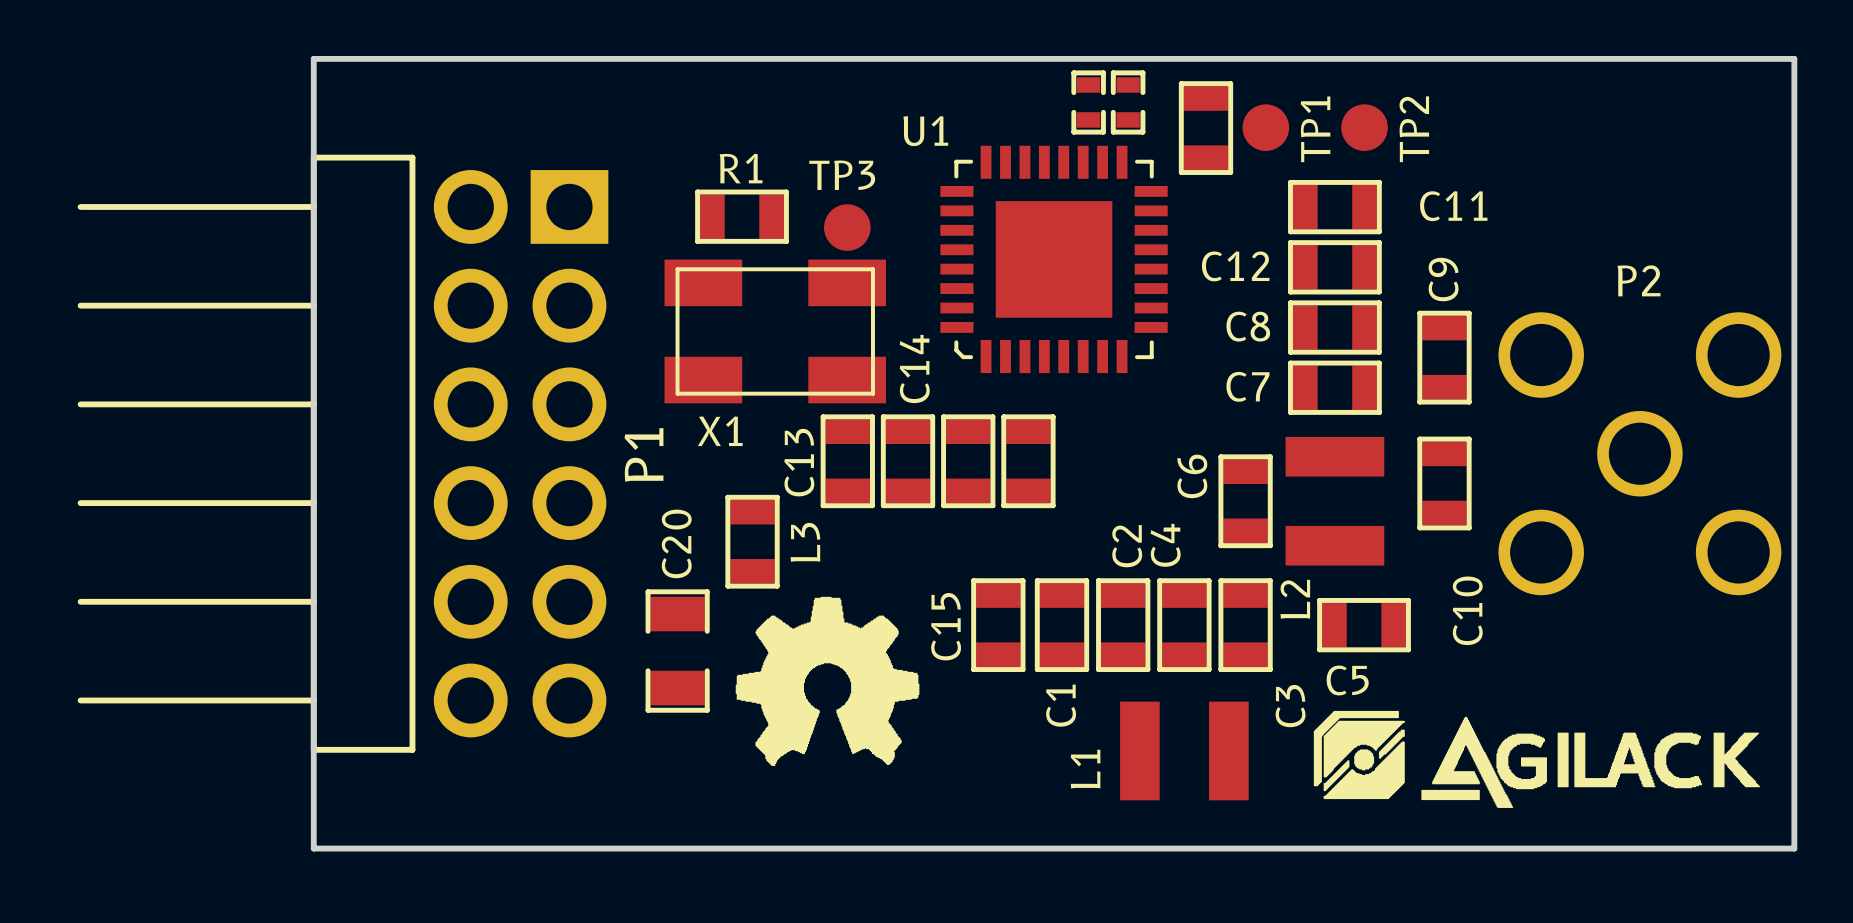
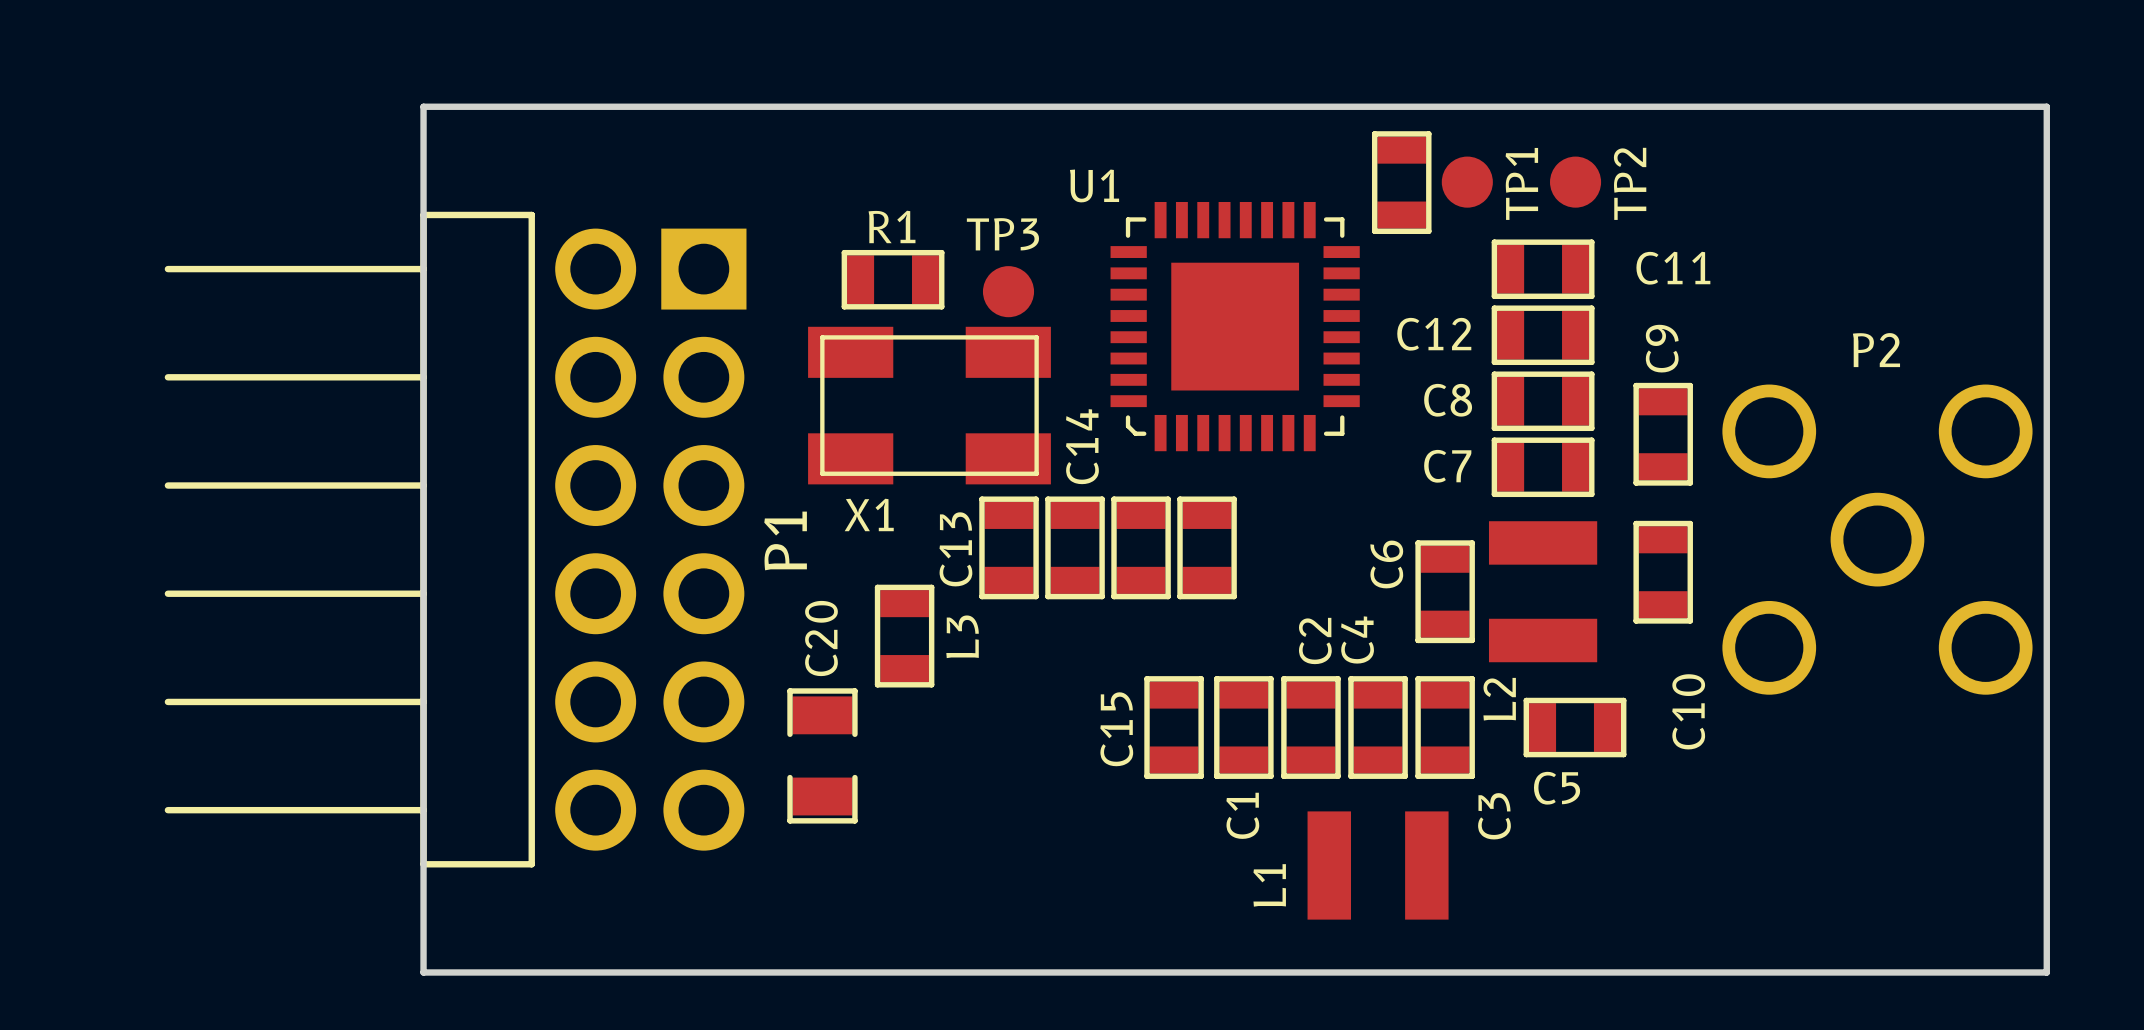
part: (1088, 102) -> none
part: (1128, 102) -> none
drawing: [735, 596, 920, 766] -> none
drawing: [1313, 711, 1761, 808] -> none

